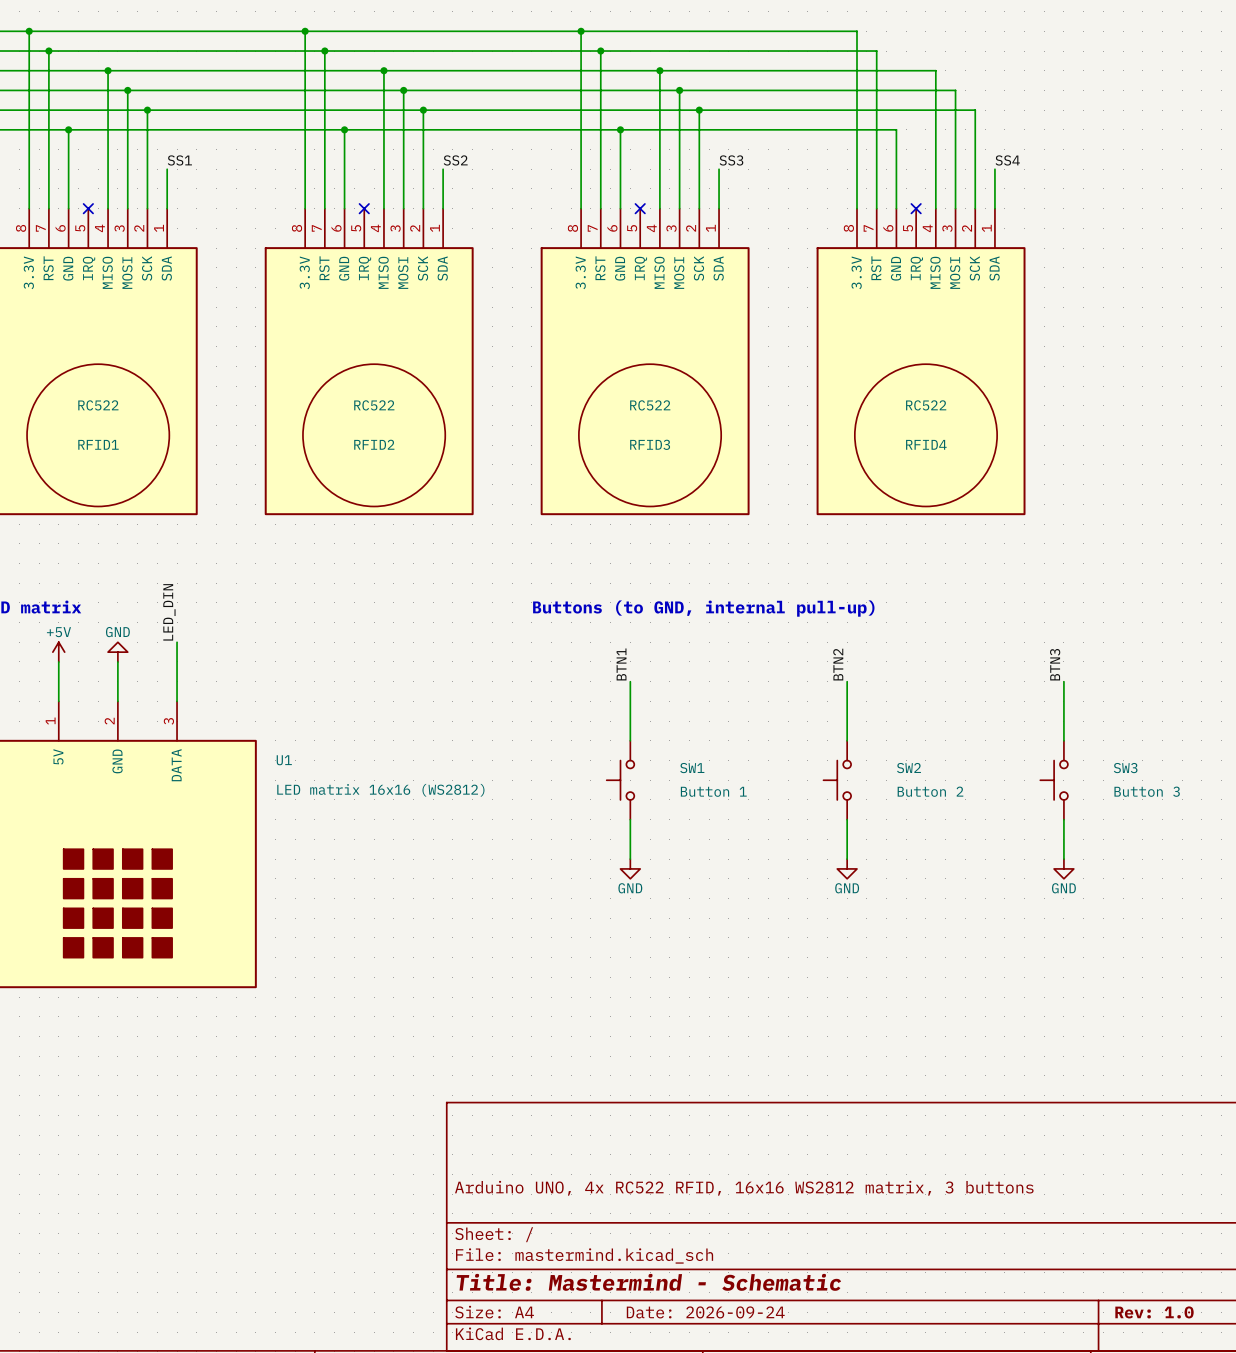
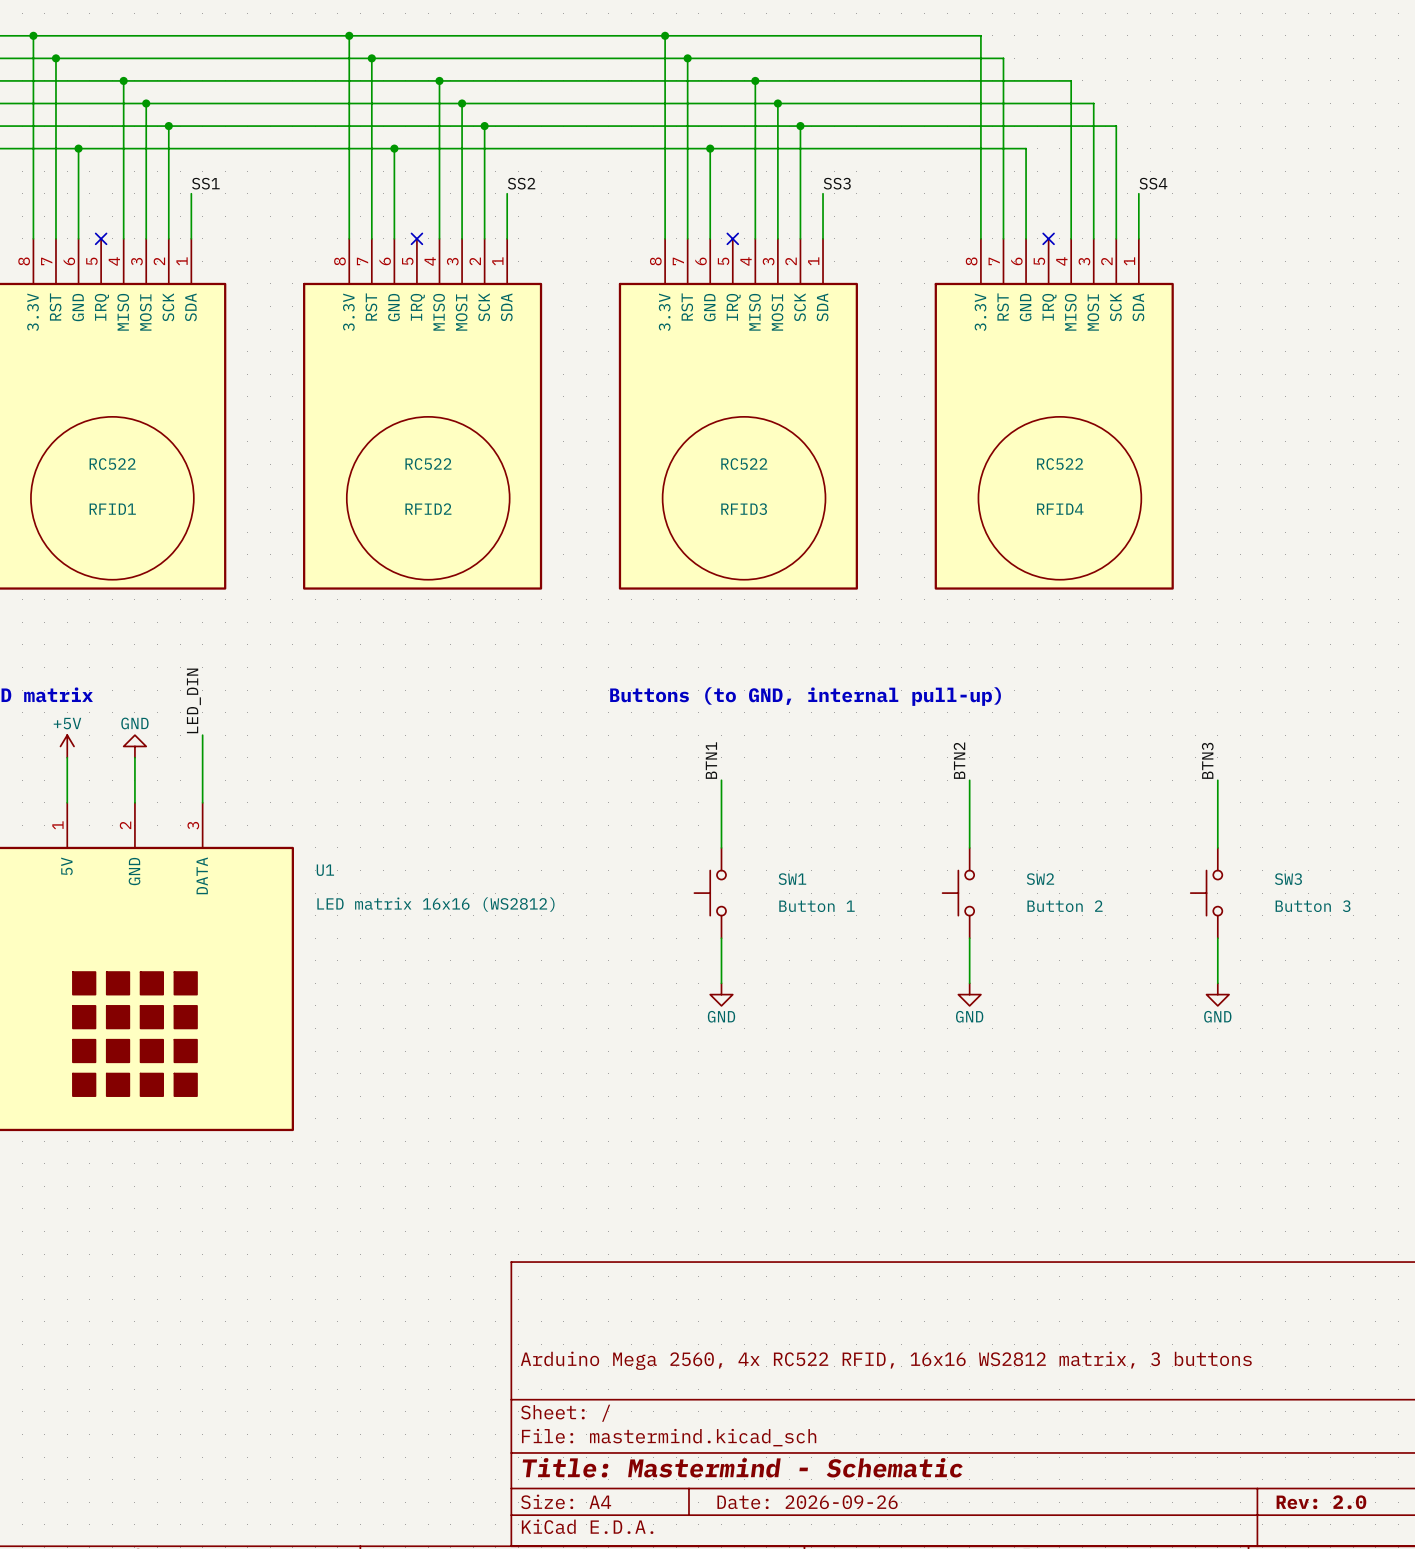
title block: Arduino UNO, 4x RC522 RFID, 16x16 WS2812 matrix, 3 buttons (744, 1188) -> Arduino Mega 2560, 4x RC522 RFID, 16x16 WS2812 matrix, 3 buttons (886, 1360)
title block: Date: 2026-09-24 (705, 1312) -> Date: 2026-09-26 (807, 1502)
title block: Rev: 1.0 (1154, 1312) -> Rev: 2.0 (1321, 1502)

